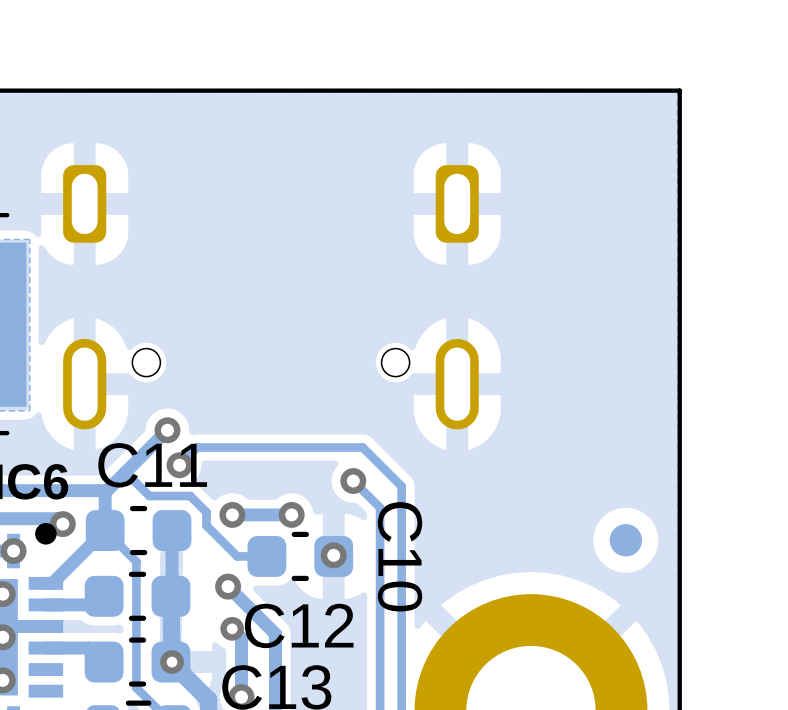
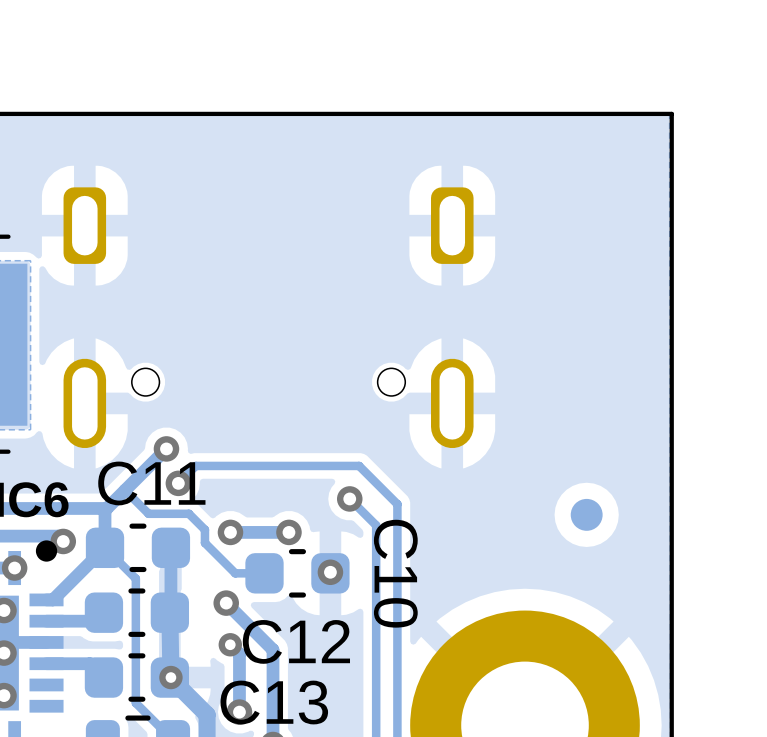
part position: (625, 540) -> (586, 514)

